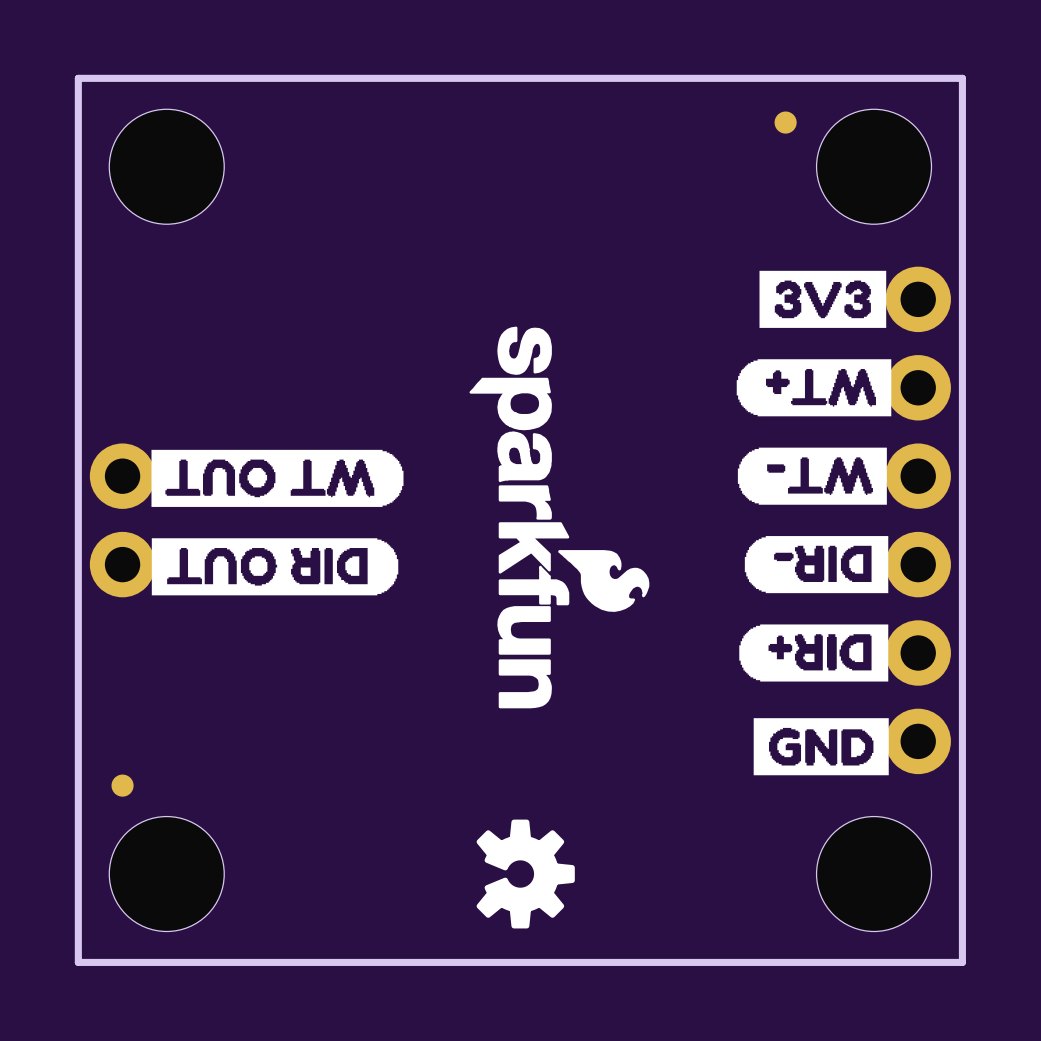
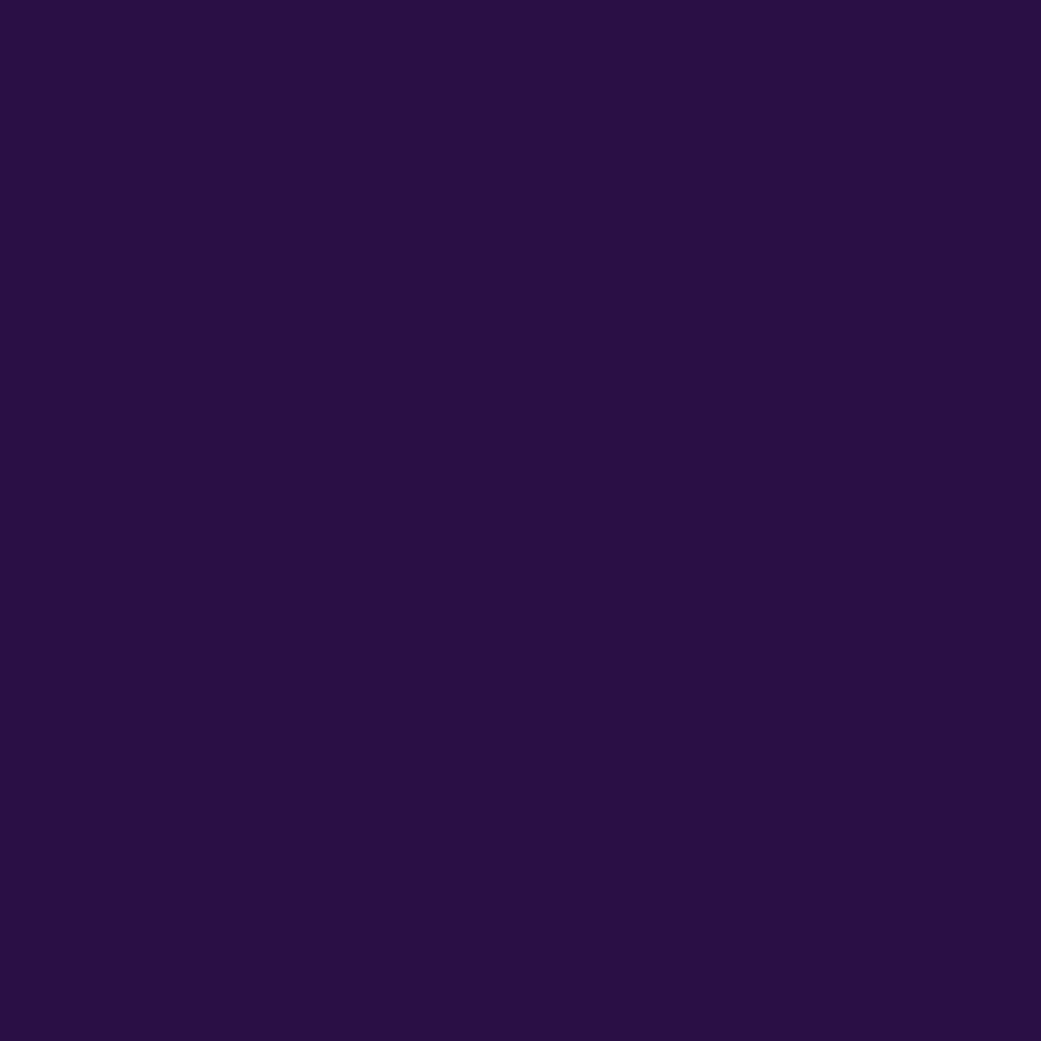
board edge: (962, 78) (78, 78) (78, 962) (962, 962) (962, 78) -> none
part: (785, 122) -> none
part: (166, 166) -> none
part: (874, 166) -> none
drawing: [736, 270, 892, 776] -> none
drawing: [469, 326, 650, 709] -> none
drawing: [151, 449, 404, 596] -> none
part: (122, 520) -> none
part: (918, 520) -> none
part: (122, 785) -> none
drawing: [476, 819, 575, 929] -> none
part: (166, 874) -> none
part: (874, 874) -> none

